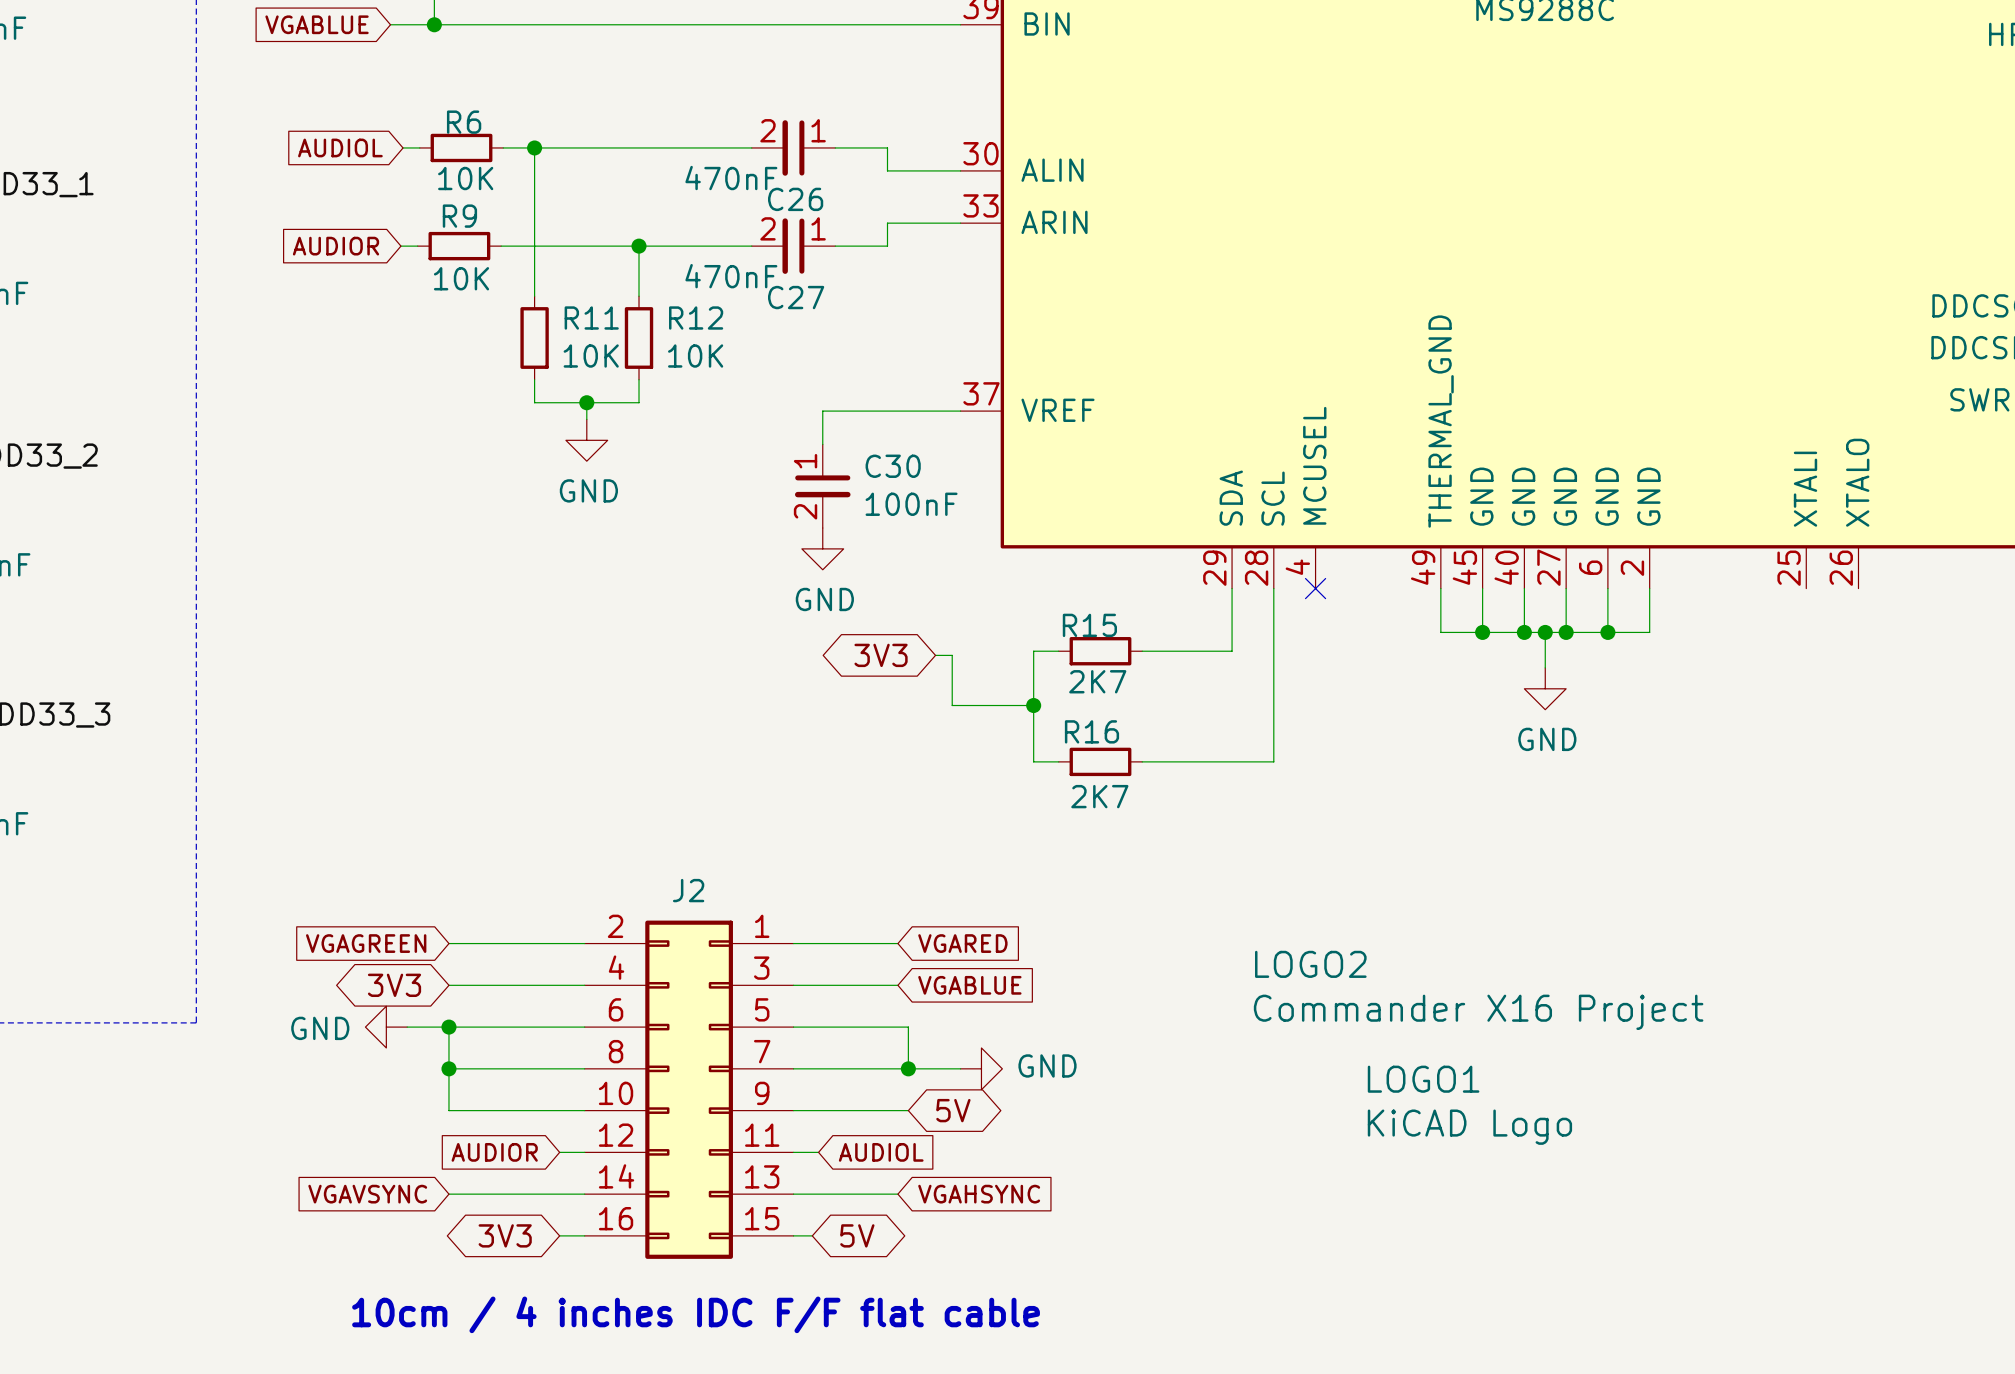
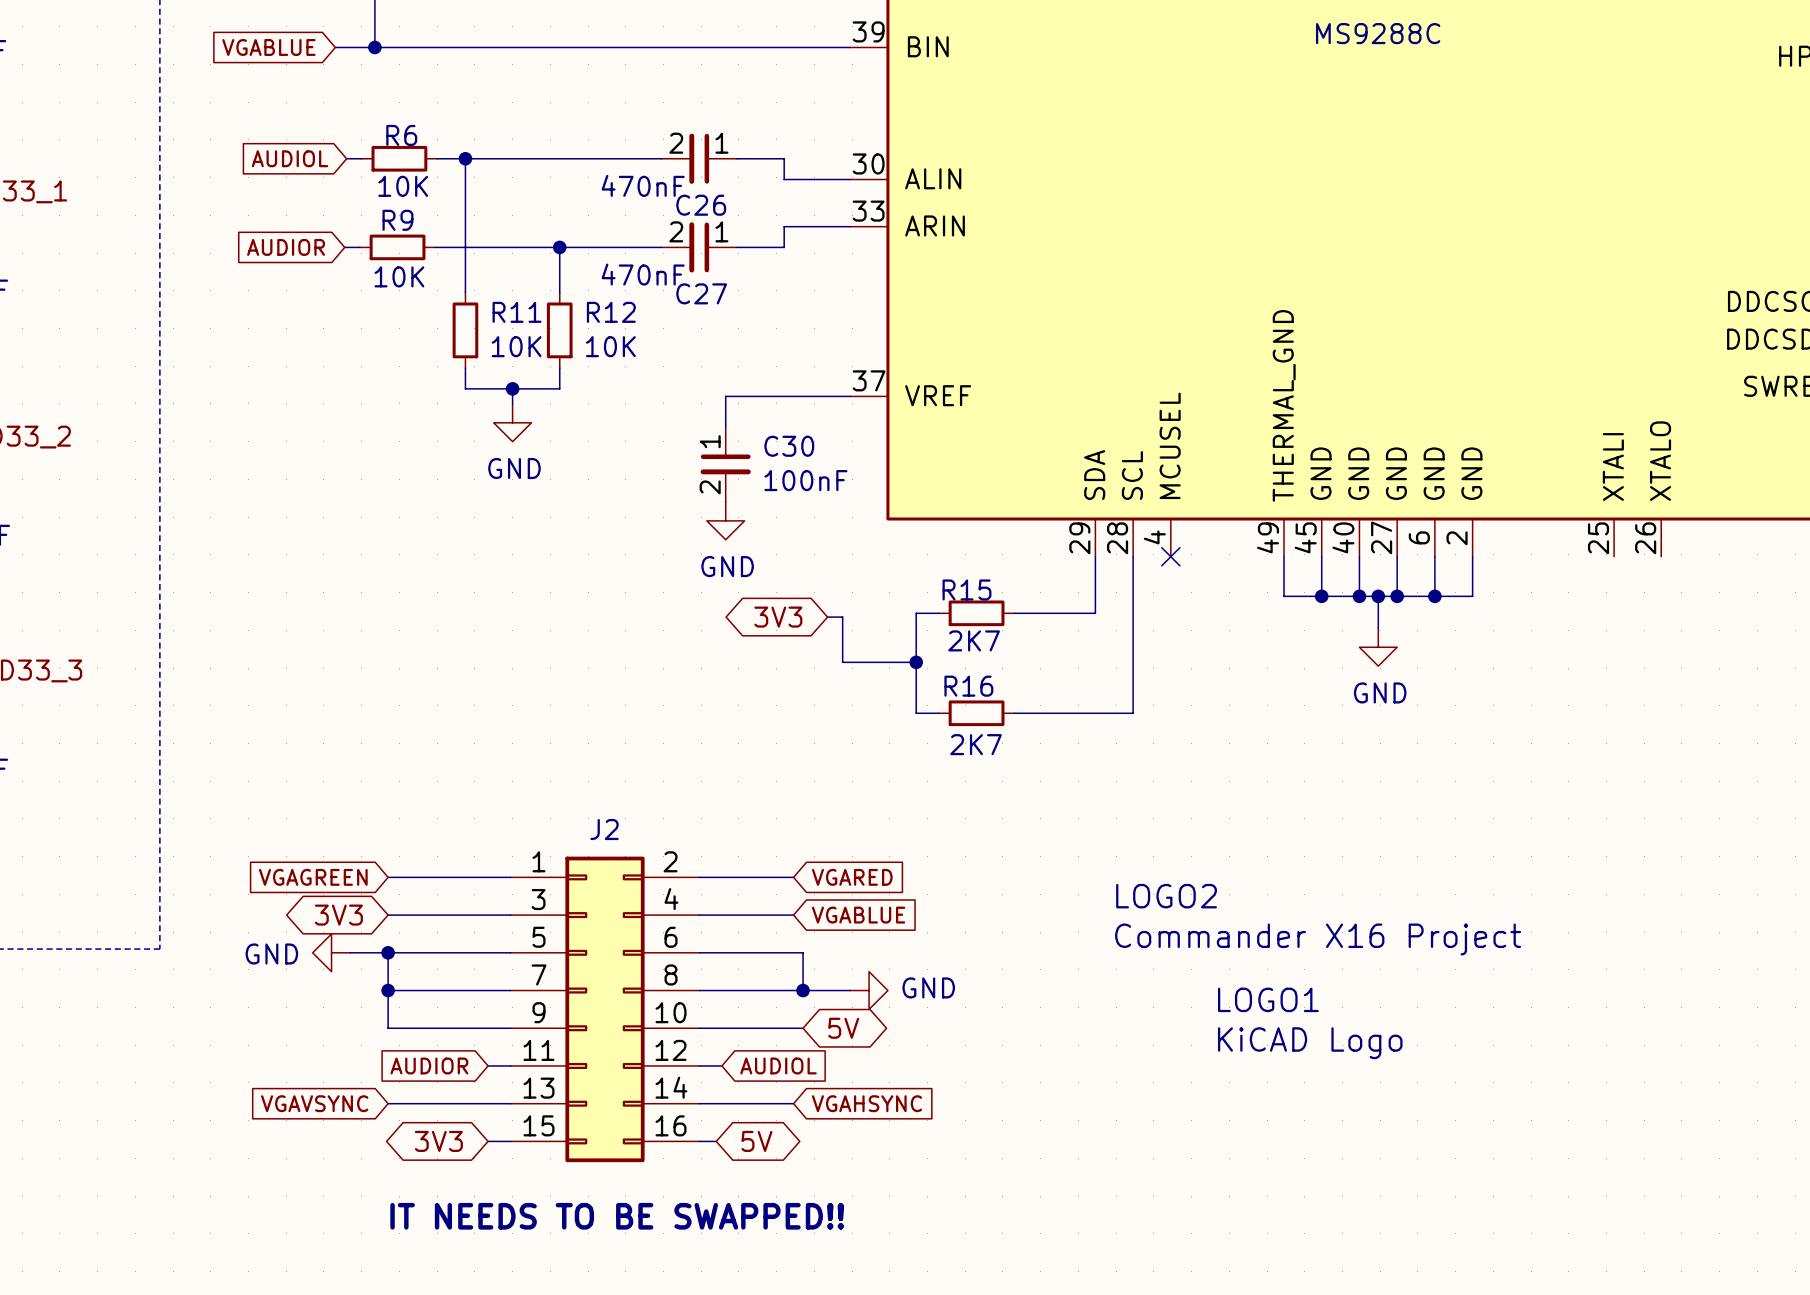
J2 flip: as is (689, 1089) -> left-right (605, 1009)
text: 10cm / 4 inches IDC F/F flat cable (696, 1314) -> none
text: none -> IT NEEDS TO BE SWAPPED!! (617, 1216)

